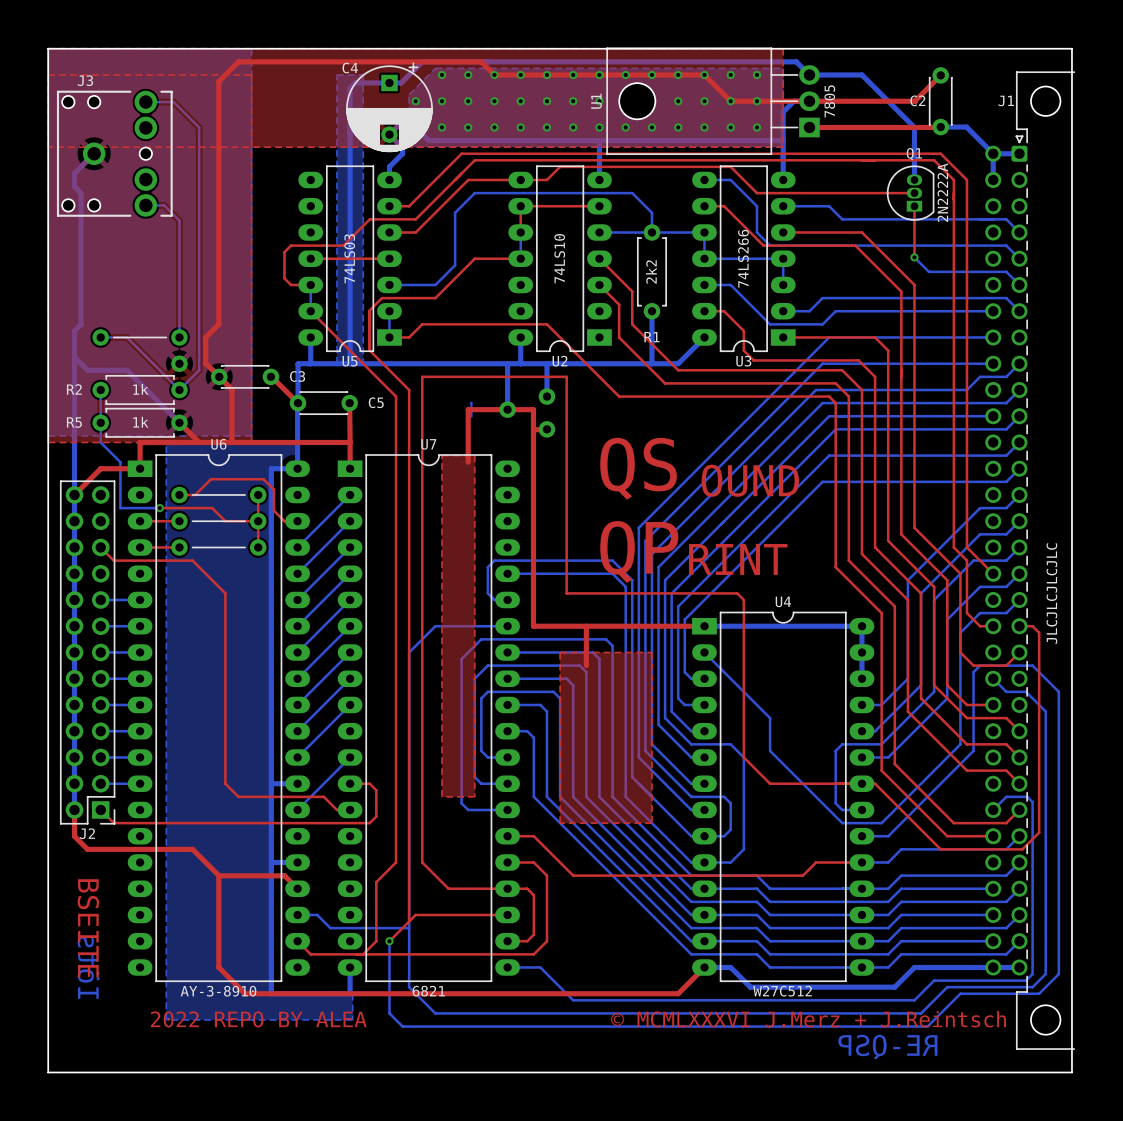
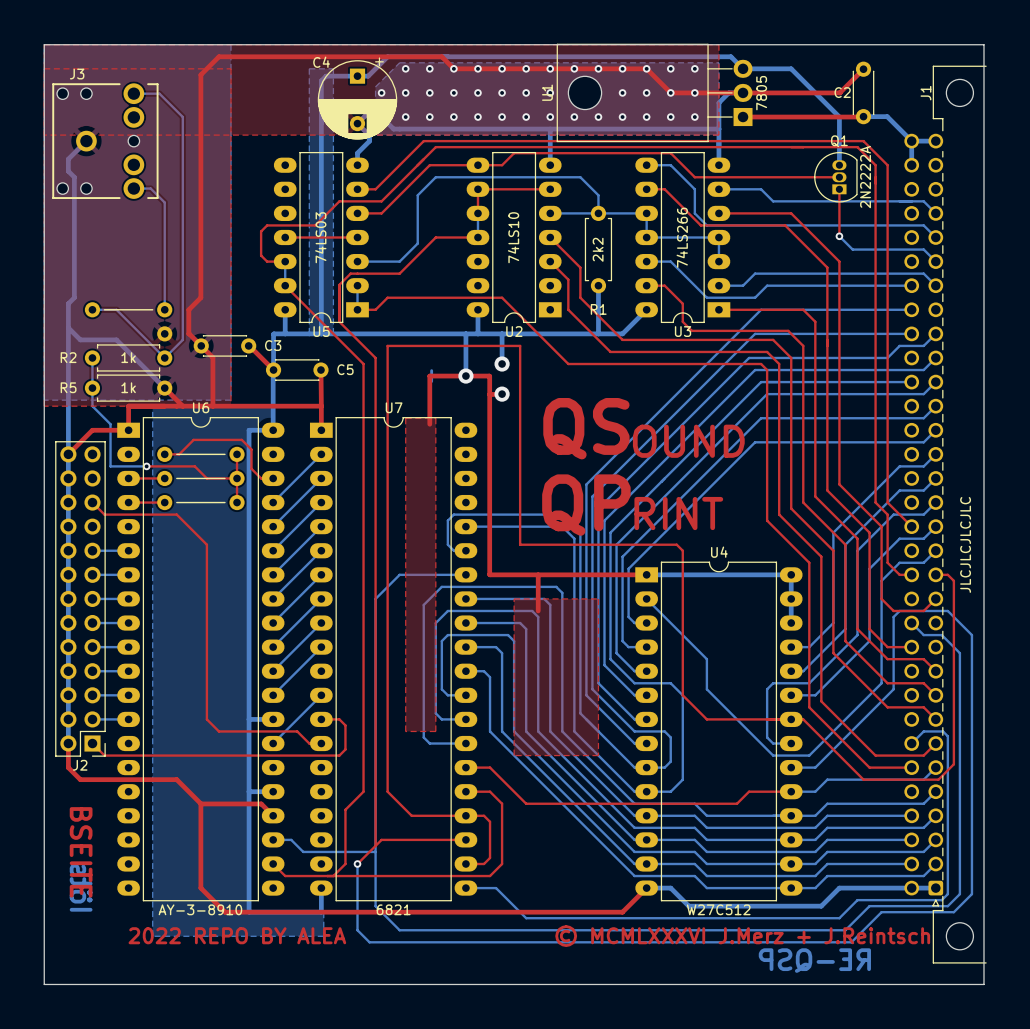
J1 footprint: [985, 71, 1075, 1050] -> [904, 65, 987, 964]
J1 name rotation: 0° (1006, 100) -> 90° counterclockwise (925, 93)

